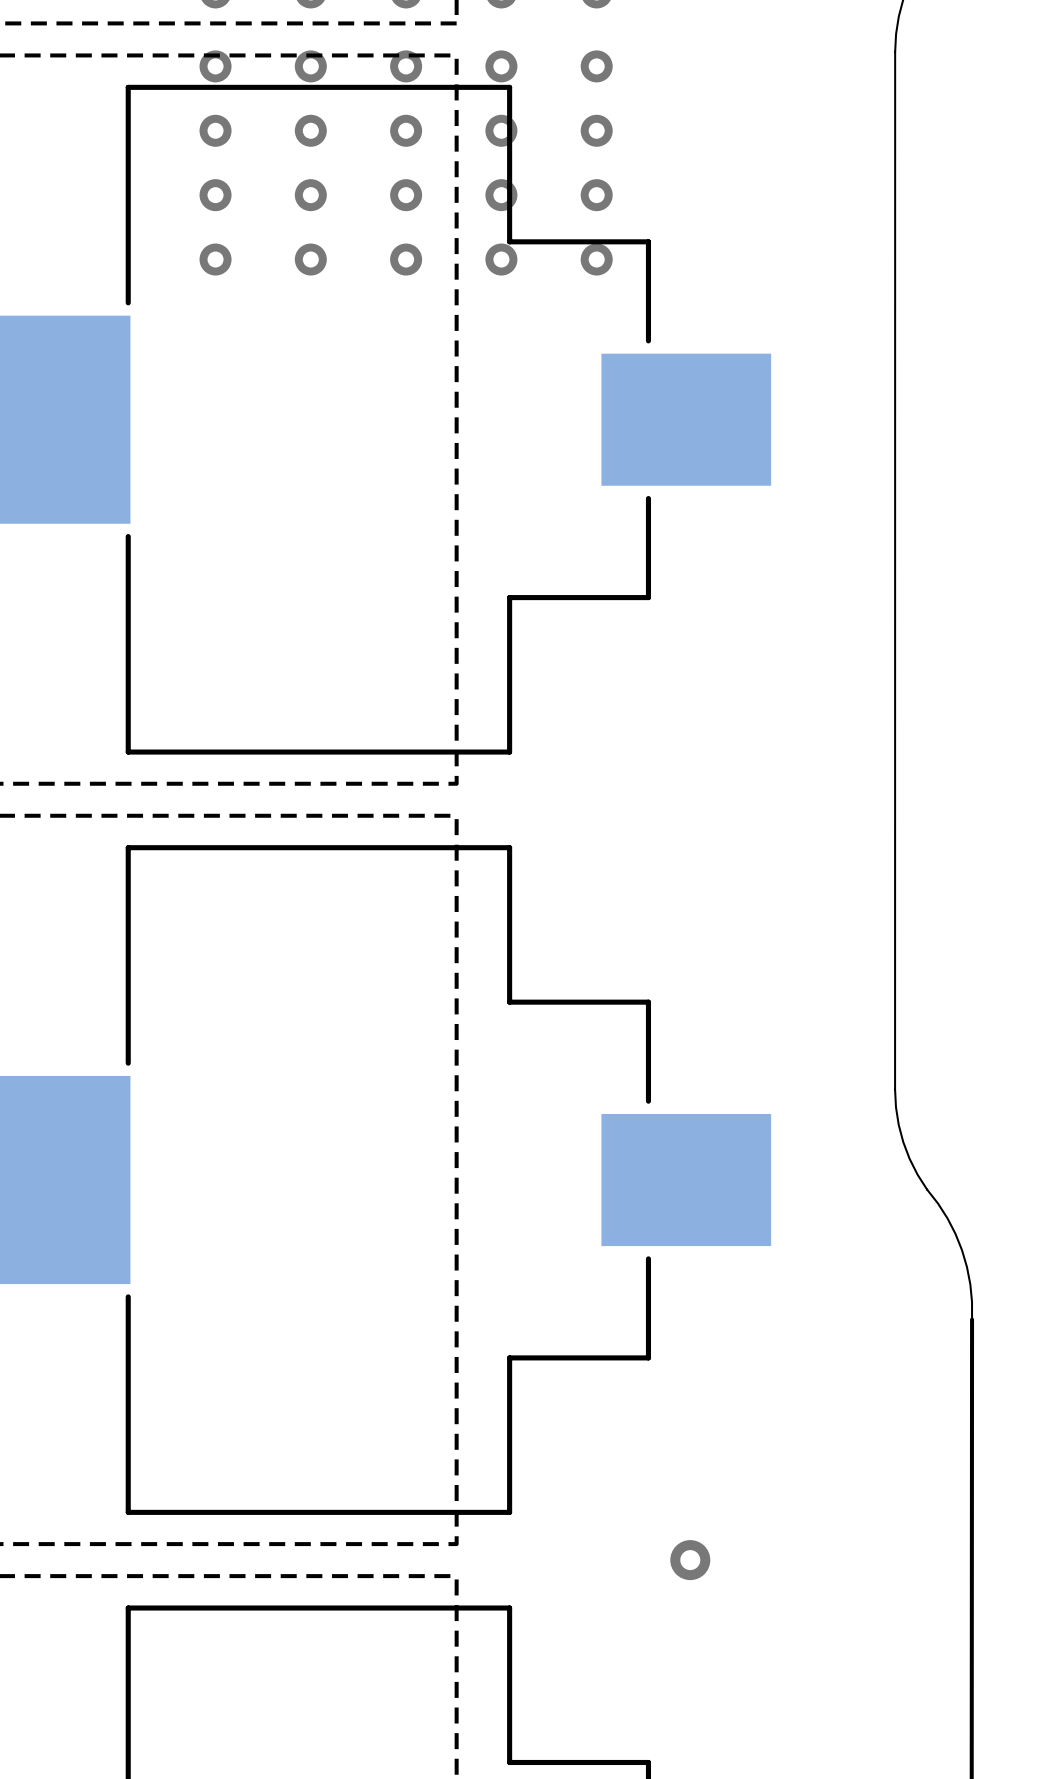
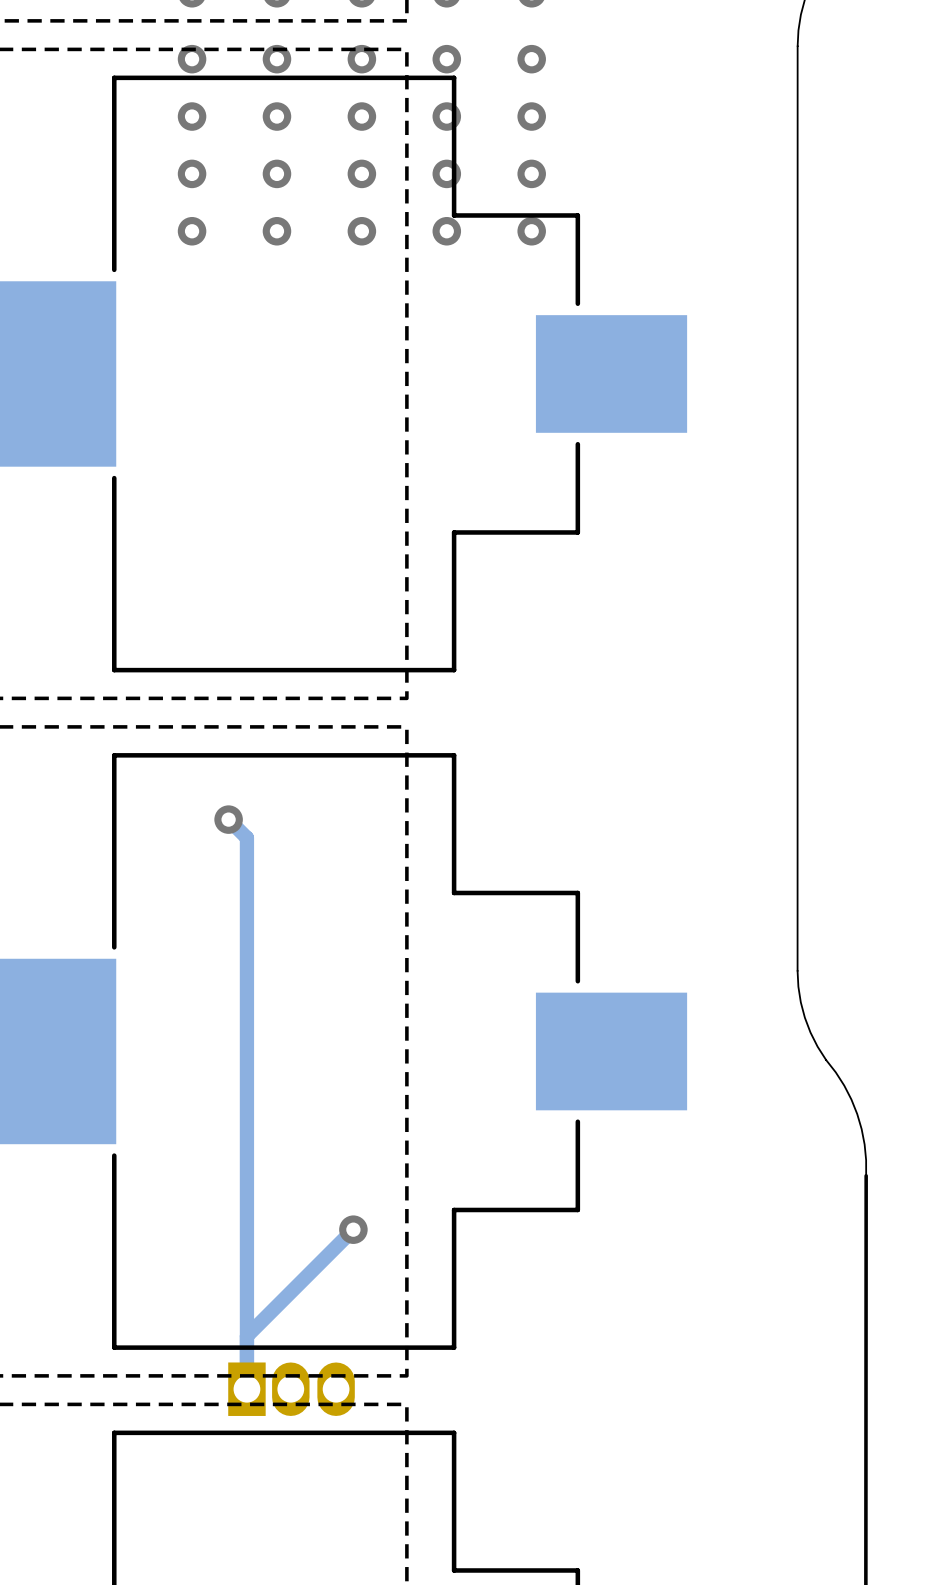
track: none -> (228, 819) (246, 837) (246, 1389)
via: none -> (228, 819)
track: none -> (353, 1229) (246, 1336)
via: none -> (353, 1229)
part: none -> (291, 1389)
via: (690, 1560) -> none

